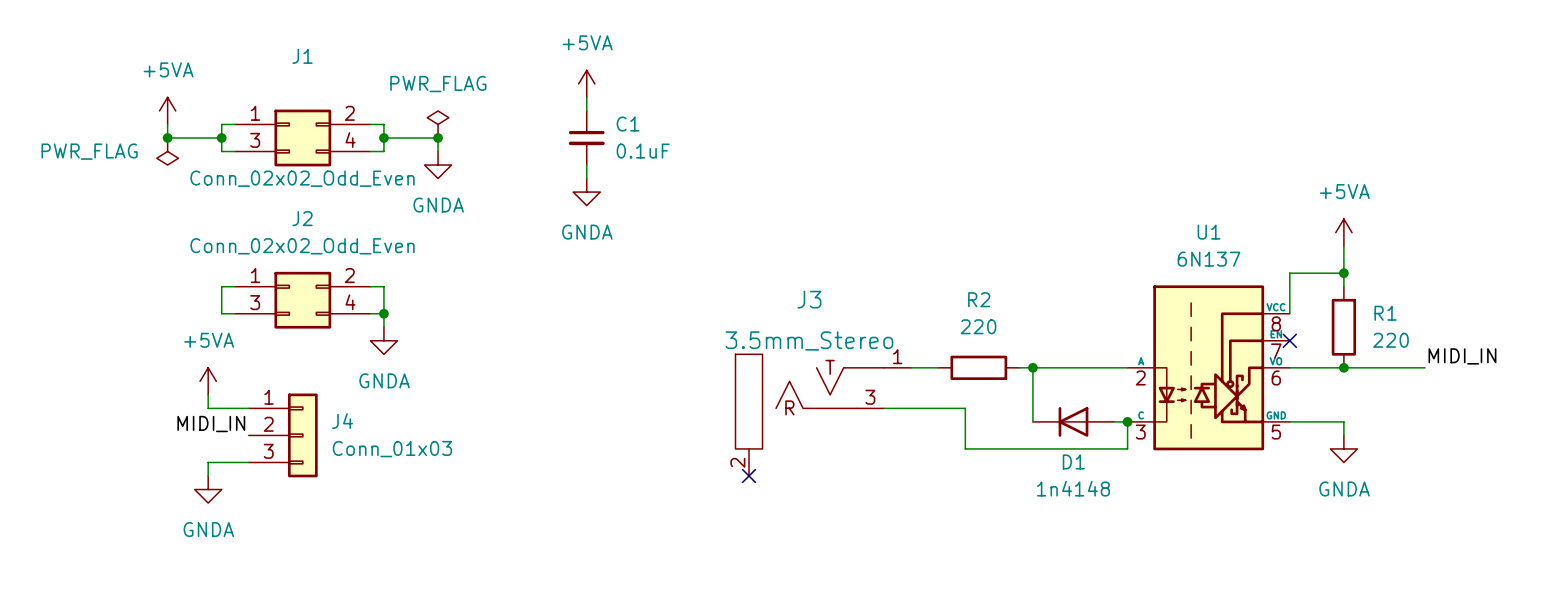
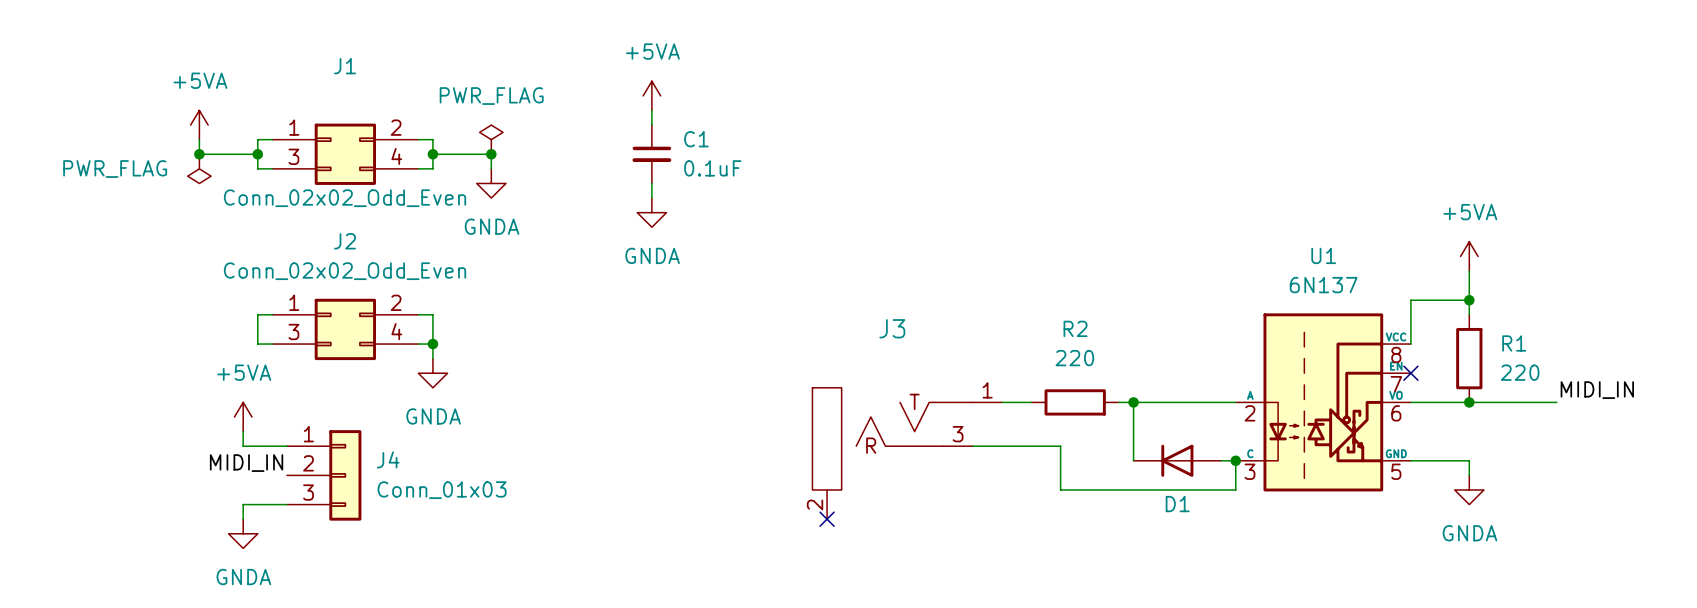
J3 value: 3.5mm_Stereo (809, 340) -> none
D1 value: 1n4148 (1073, 488) -> none

